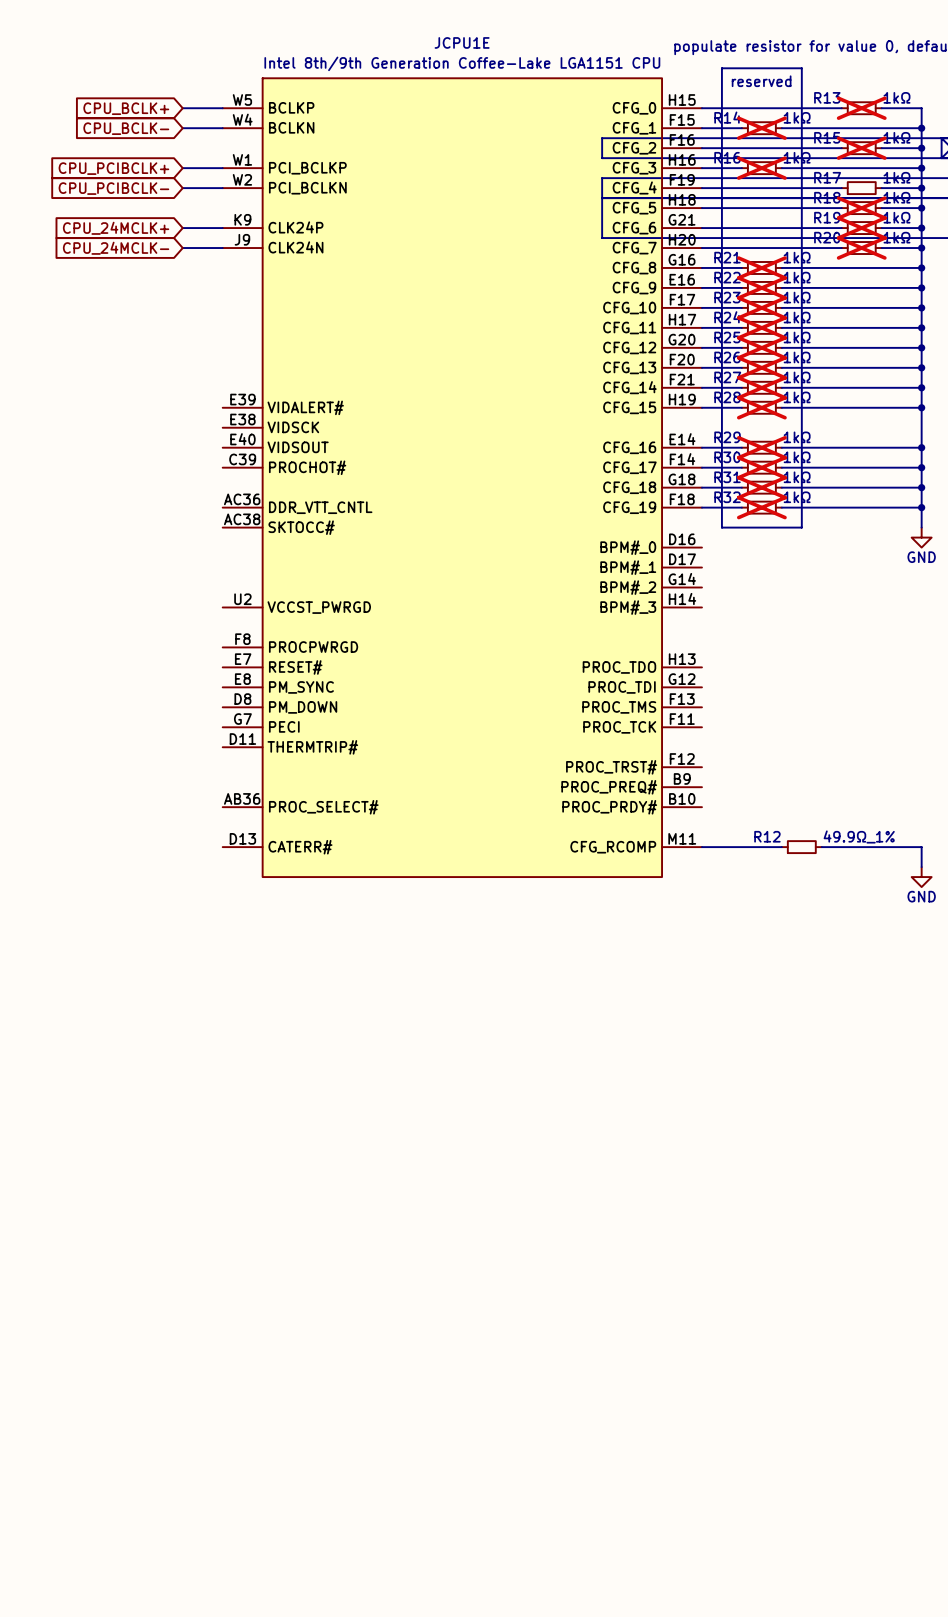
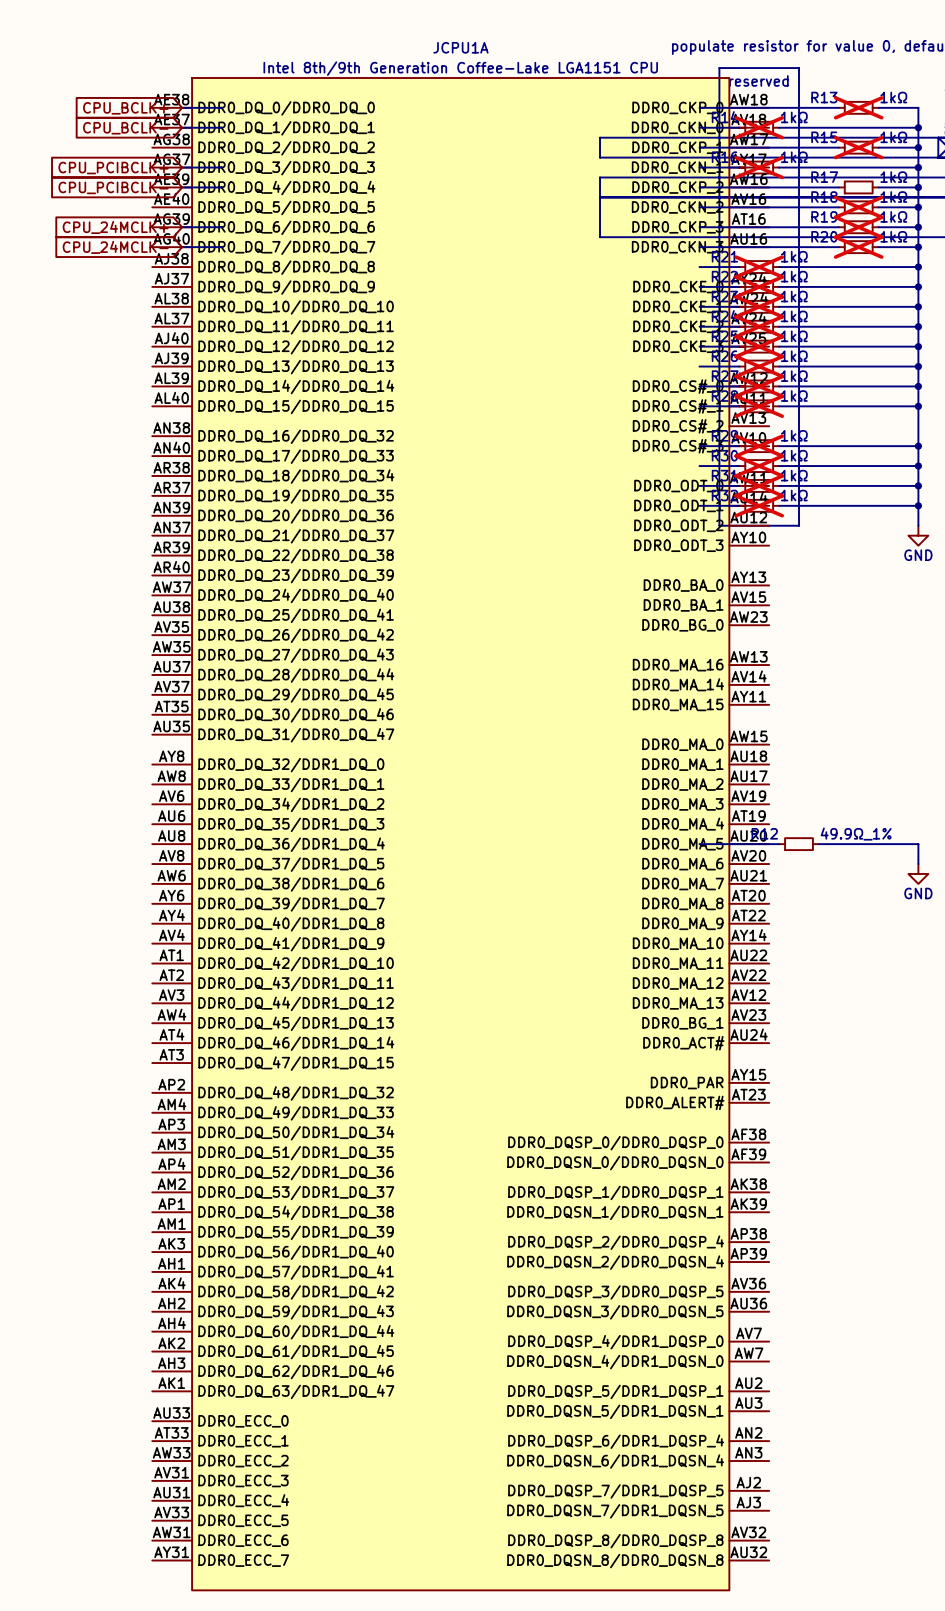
JCPU1E: Intel 8th/9th Generation Coffee-Lake LGA1151 CPU (462, 477) -> none
JCPU1A: none -> Intel 8th/9th Generation Coffee-Lake LGA1151 CPU (460, 834)

